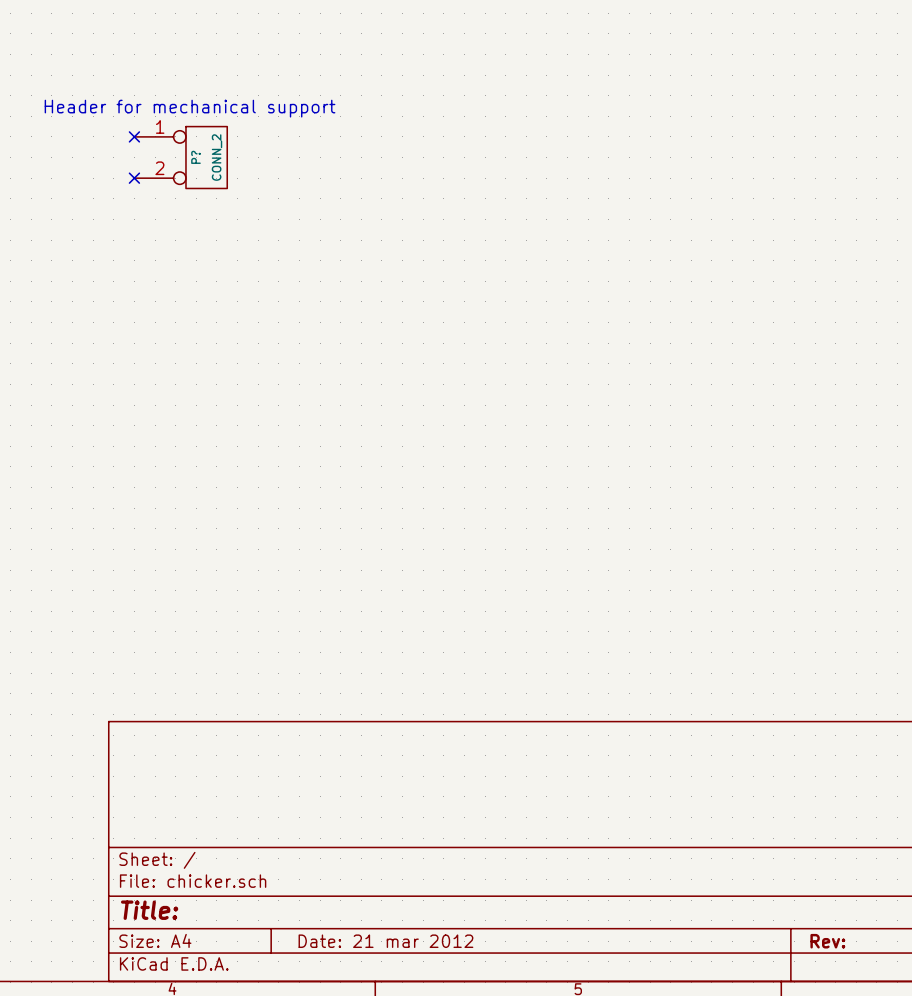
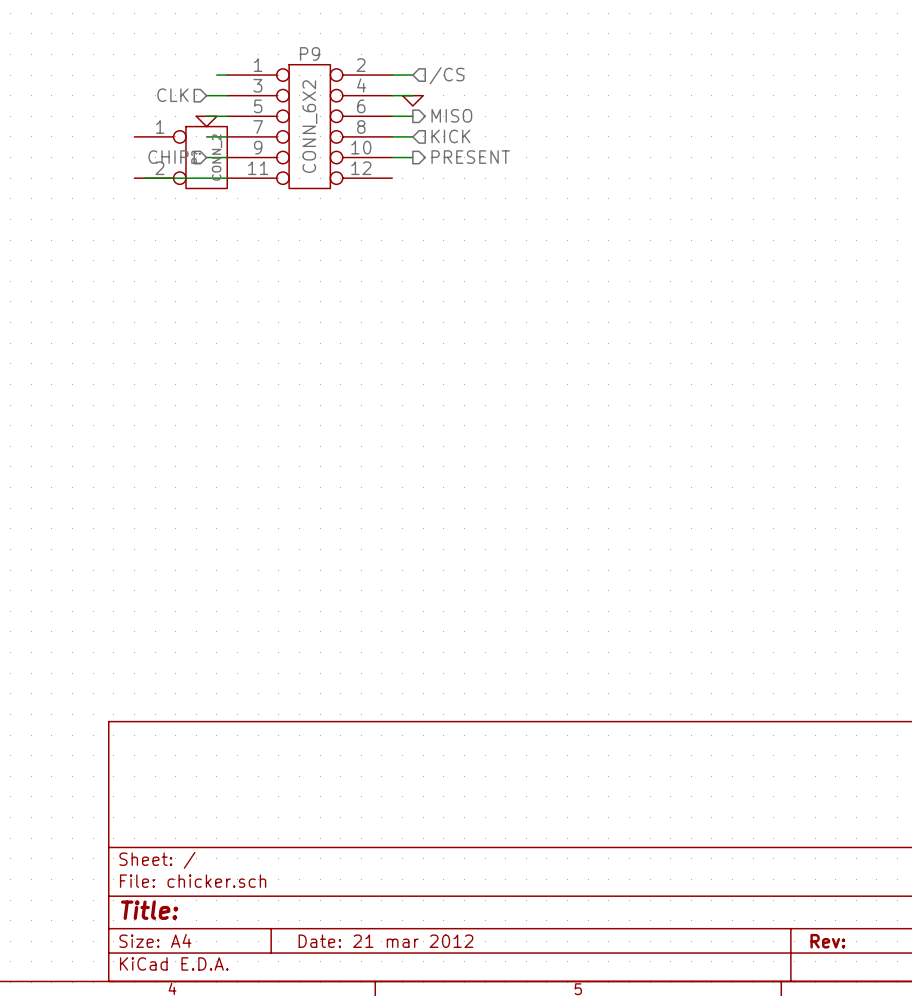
wire: none -> (216, 75) (227, 75)
wire: none -> (392, 75) (412, 75)
hierarchical label: none -> /CS (447, 75)
hierarchical label: none -> CLK (172, 95)
wire: none -> (206, 95) (227, 95)
wire: none -> (392, 95) (412, 95)
power symbol: none -> (412, 100)
text: Header for mechanical support (190, 108) -> none
hierarchical label: none -> MISO (451, 115)
wire: none -> (206, 116) (227, 116)
wire: none -> (392, 116) (412, 116)
power symbol: none -> (206, 121)
P9: none -> CONN_6X2 (309, 126)
no-connect mark: (134, 136) -> none
wire: none -> (206, 136) (227, 136)
wire: none -> (392, 136) (412, 136)
hierarchical label: none -> KICK (450, 136)
hierarchical label: none -> CHIP (168, 157)
wire: none -> (206, 157) (227, 157)
wire: none -> (392, 157) (412, 157)
hierarchical label: none -> PRESENT (470, 157)
no-connect mark: (134, 178) -> none
wire: none -> (144, 178) (227, 178)

